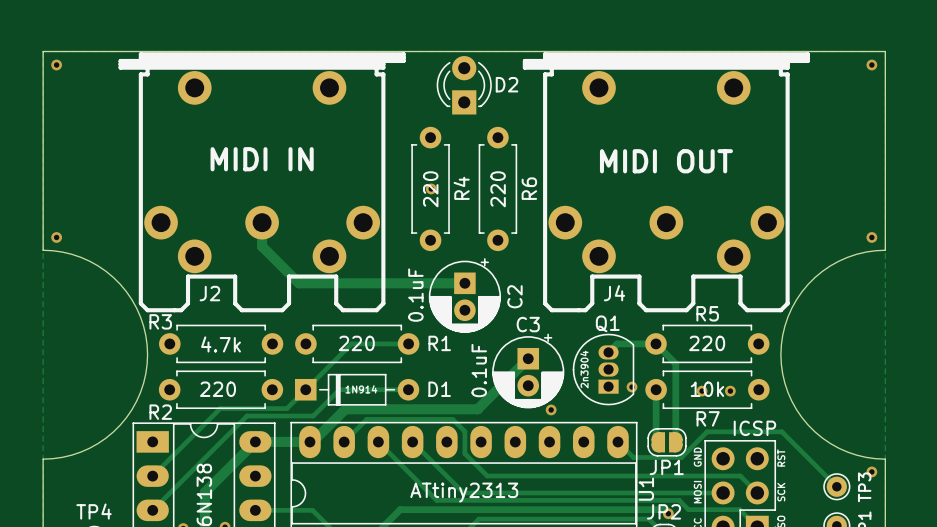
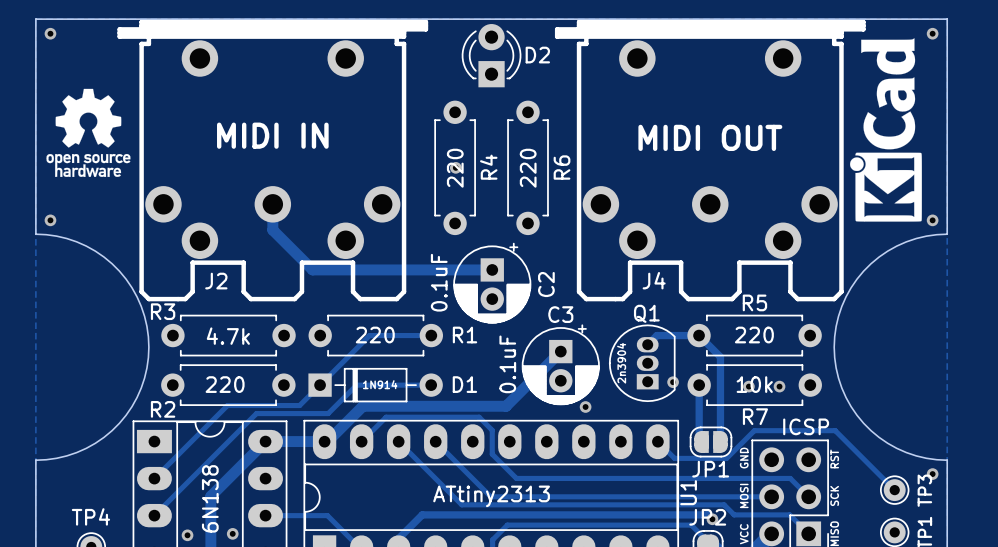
drawing: none -> [850, 38, 922, 222]
drawing: none -> [46, 88, 131, 177]

